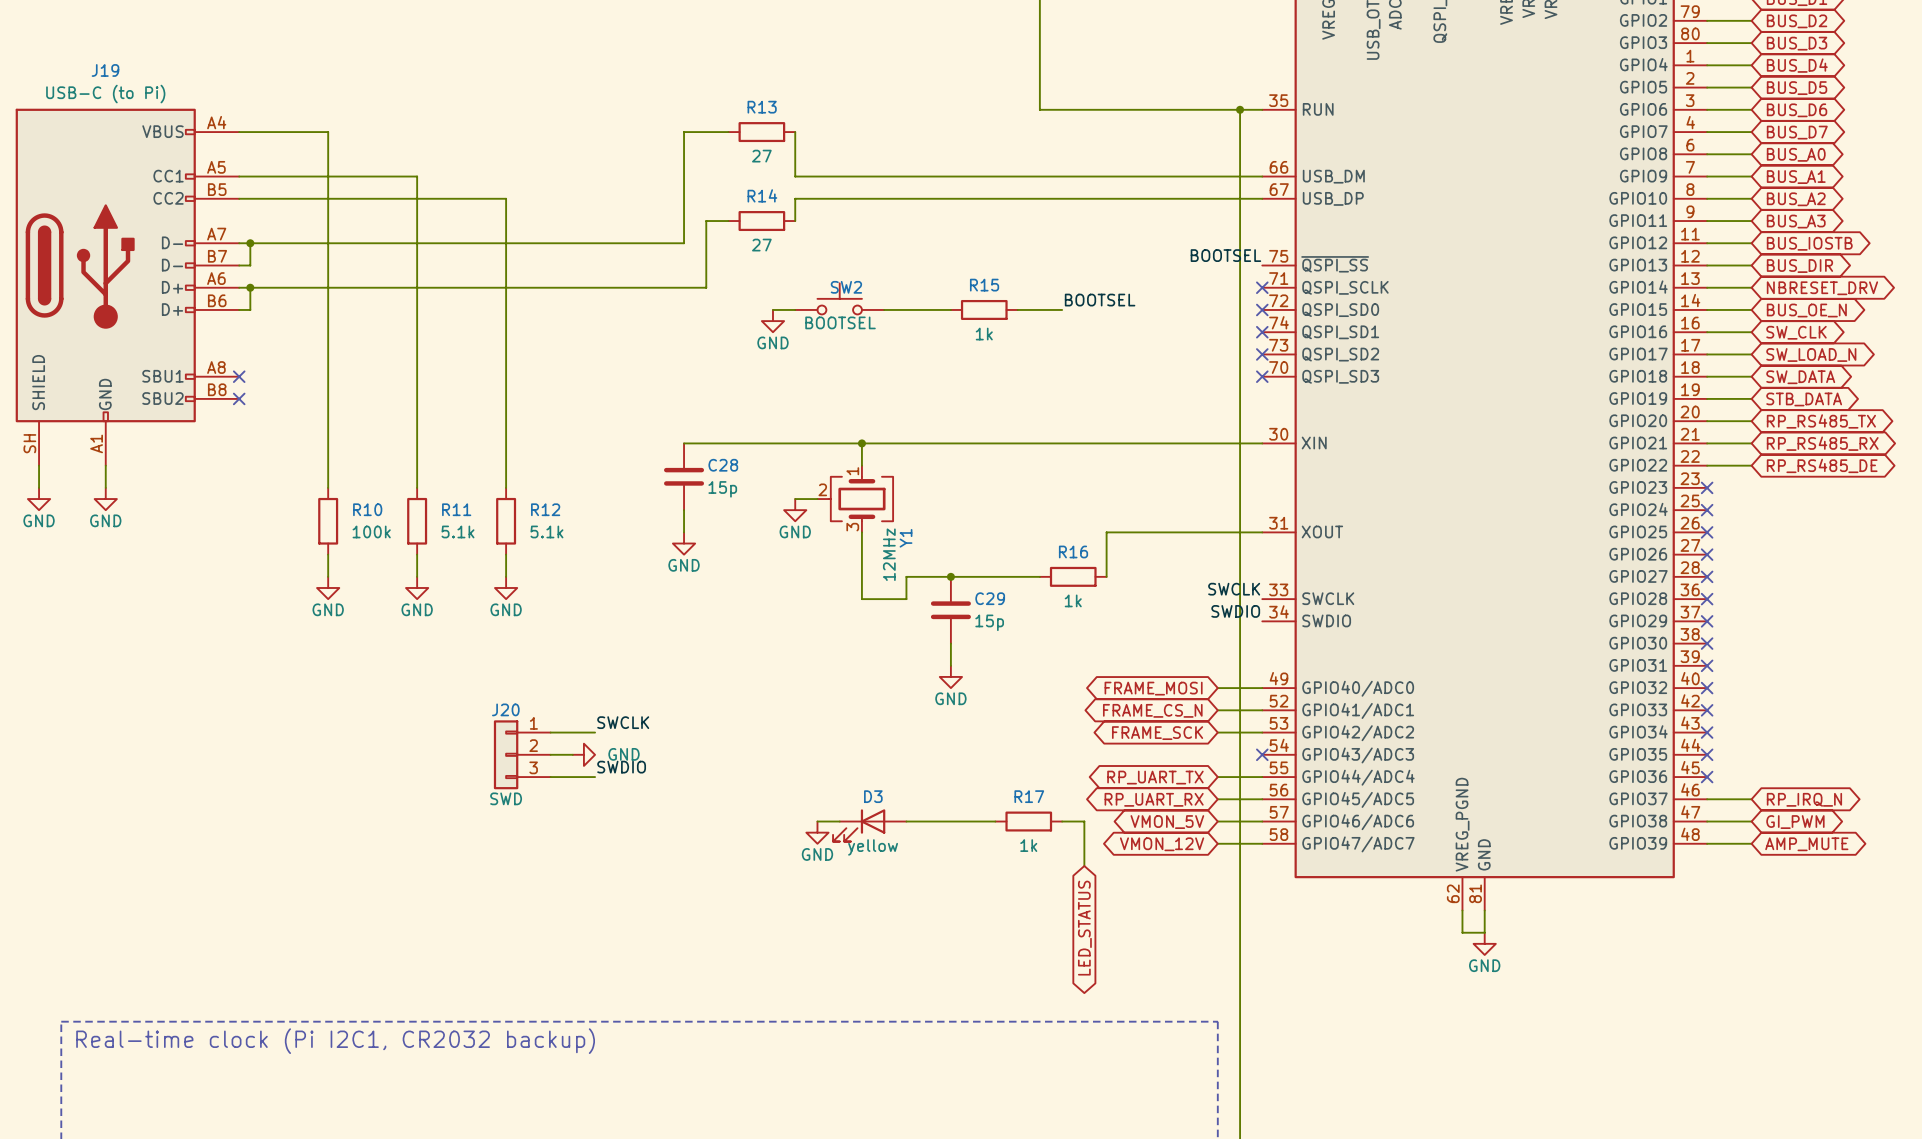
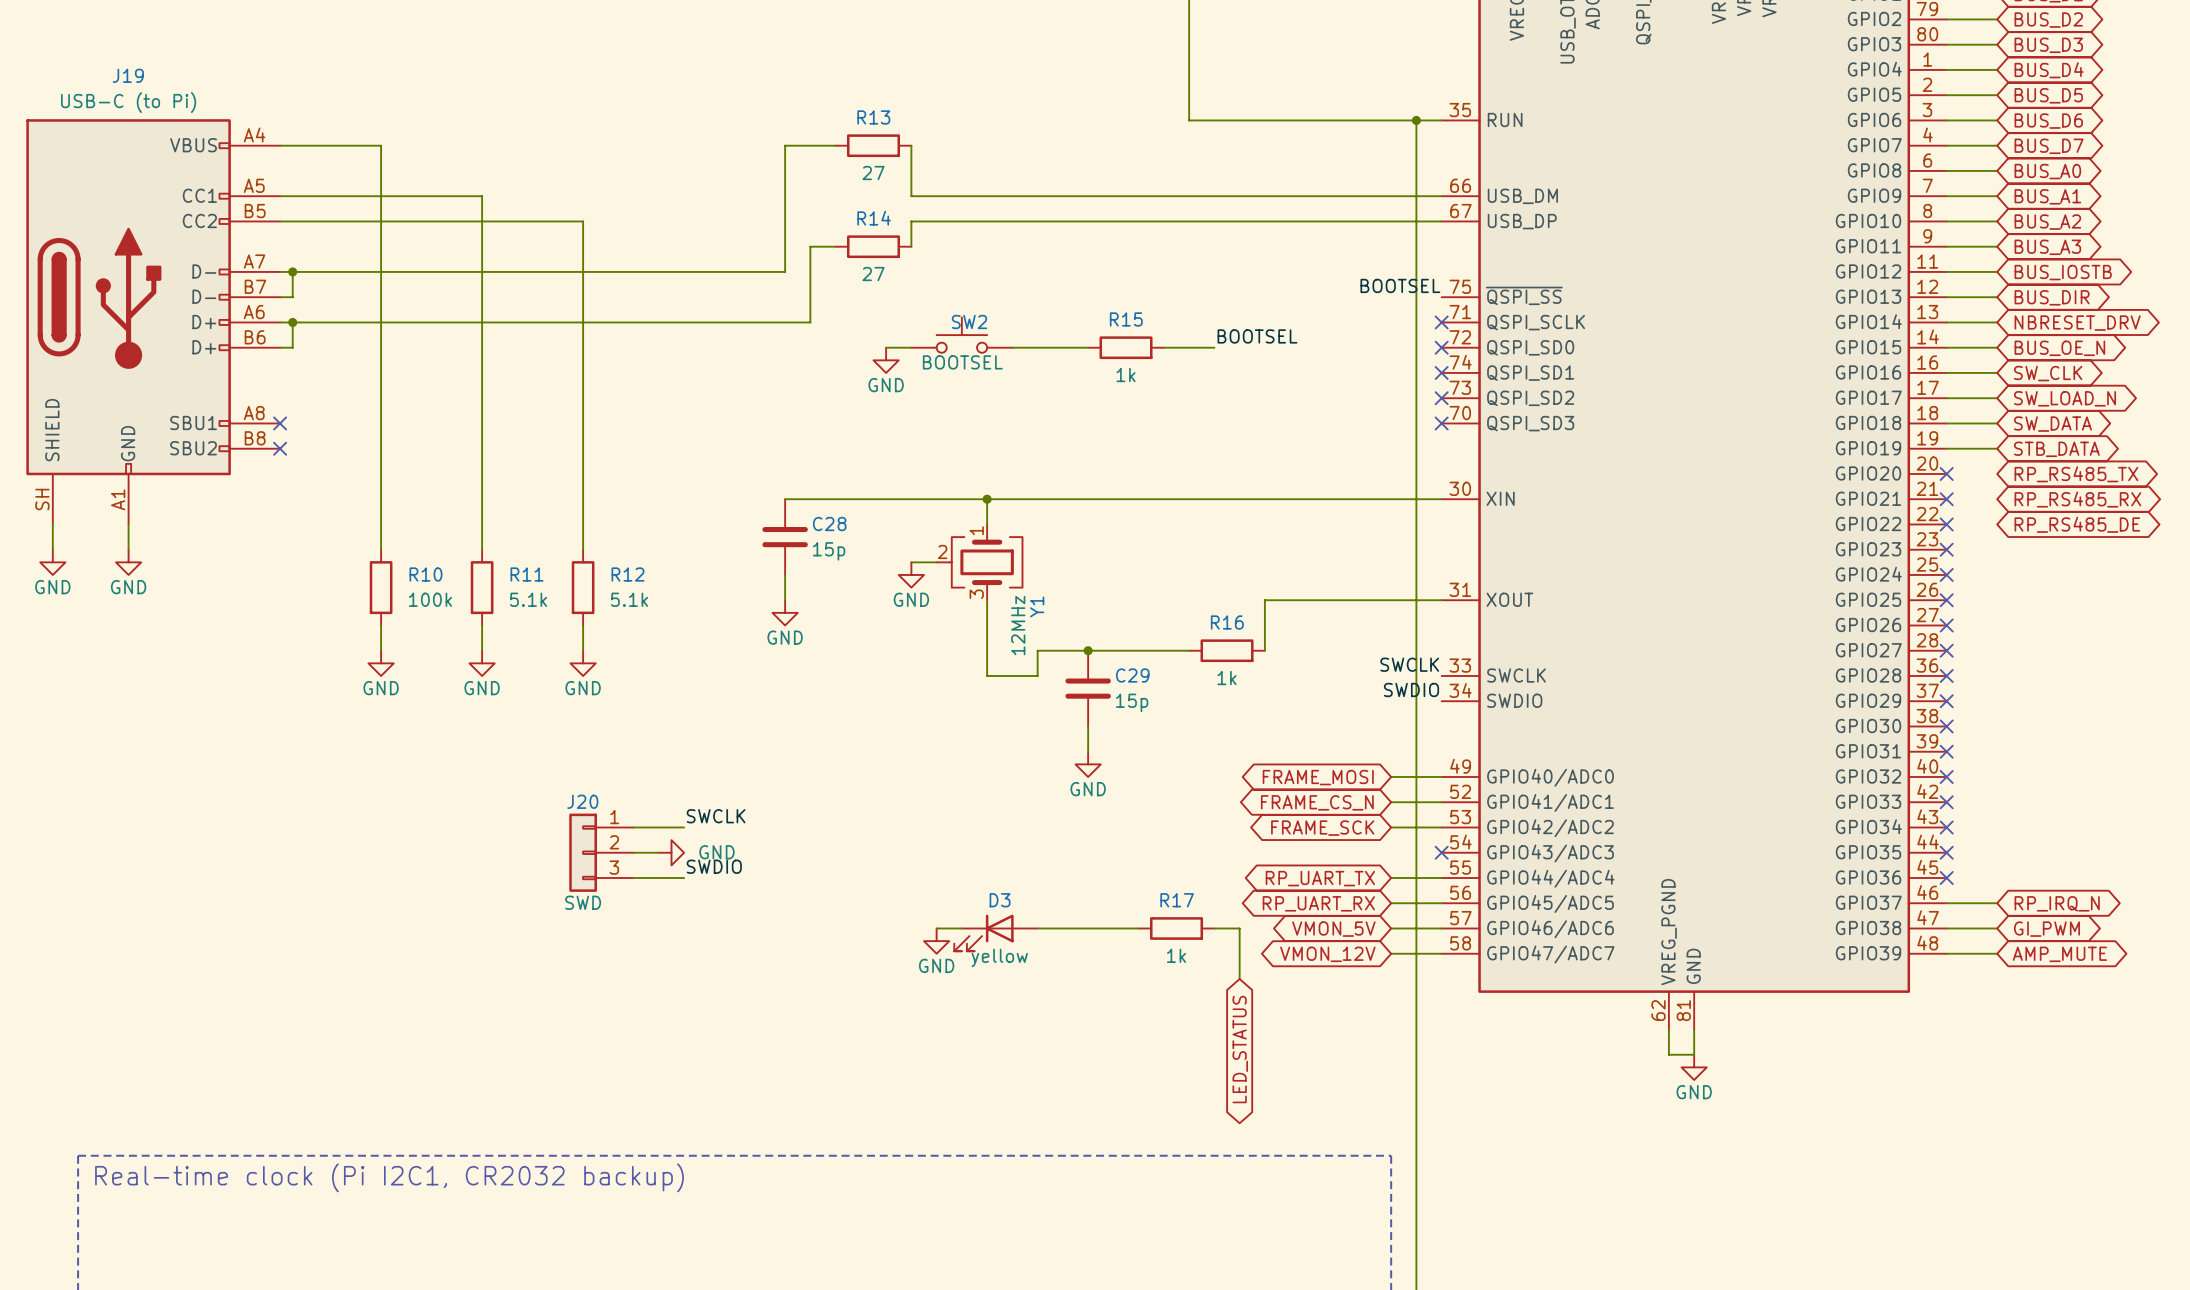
wire: (1707, 421) (1751, 421) -> none
no-connect mark: none -> (1946, 473)
wire: (1707, 443) (1751, 443) -> none
no-connect mark: none -> (1946, 499)
wire: (1707, 465) (1751, 465) -> none
no-connect mark: none -> (1946, 524)

